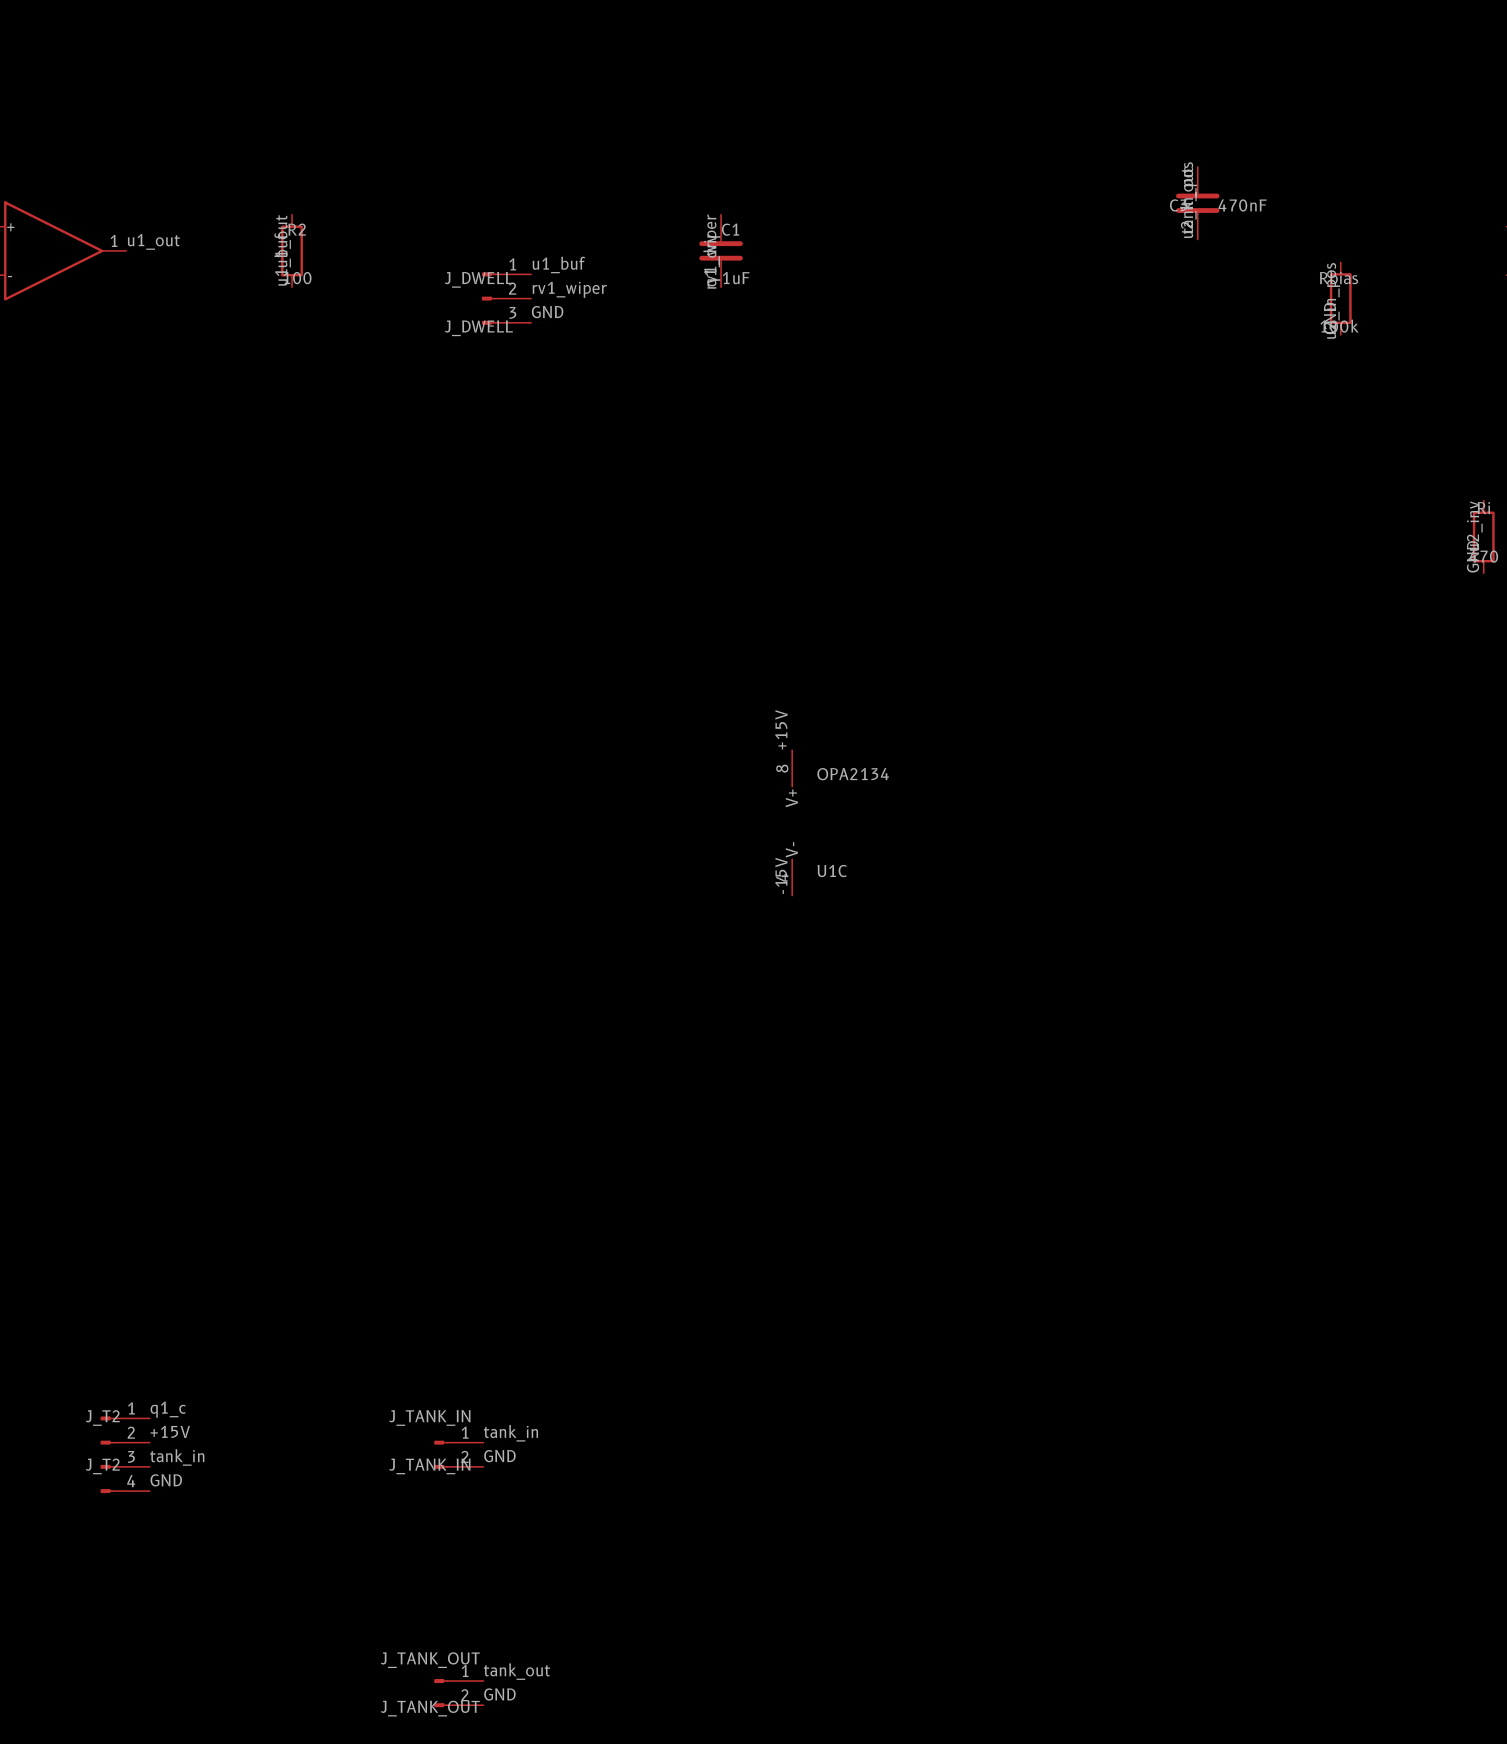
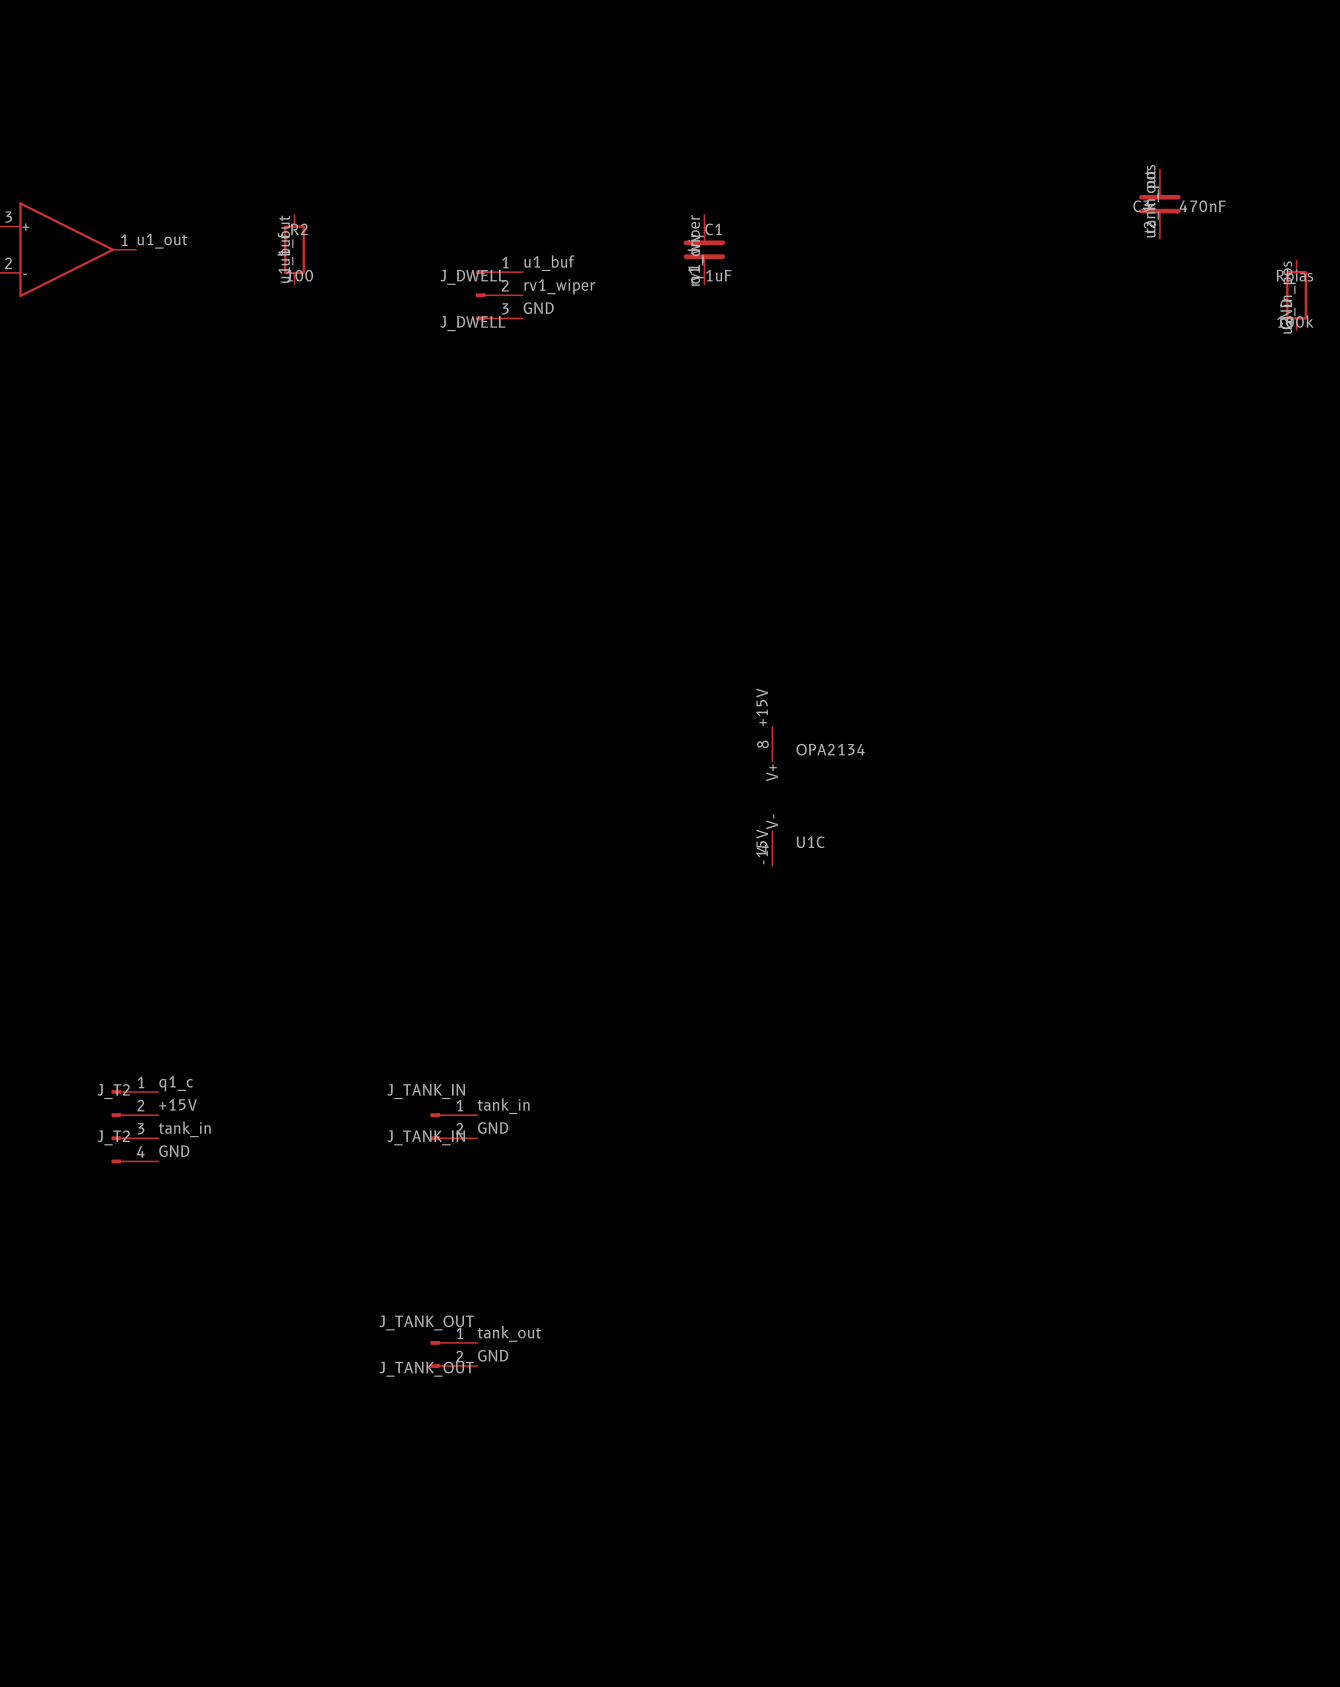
label: none -> q1_c (176, 1083)
label: none -> +15V (178, 1104)
label: none -> tank_in (503, 1106)
J_TANK_IN: none -> J_TANK_IN (453, 1126)
label: none -> GND (493, 1128)
label: none -> tank_in (184, 1129)
label: none -> GND (174, 1151)
label: none -> tank_out (509, 1333)
J_TANK_OUT: none -> J_TANK_OUT (453, 1354)
label: q1_c (168, 1409) -> none
label: +15V (170, 1431) -> none
label: tank_in (510, 1433) -> none
J_T2 position: (125, 1454) -> (135, 1126)
J_TANK_IN: J_TANK_IN (458, 1454) -> none
label position: GND (499, 1456) -> GND (493, 1355)
label: tank_in (177, 1457) -> none
label: GND (166, 1480) -> none
label: tank_out (517, 1671) -> none
J_TANK_OUT: J_TANK_OUT (458, 1693) -> none
label: GND (499, 1694) -> none

